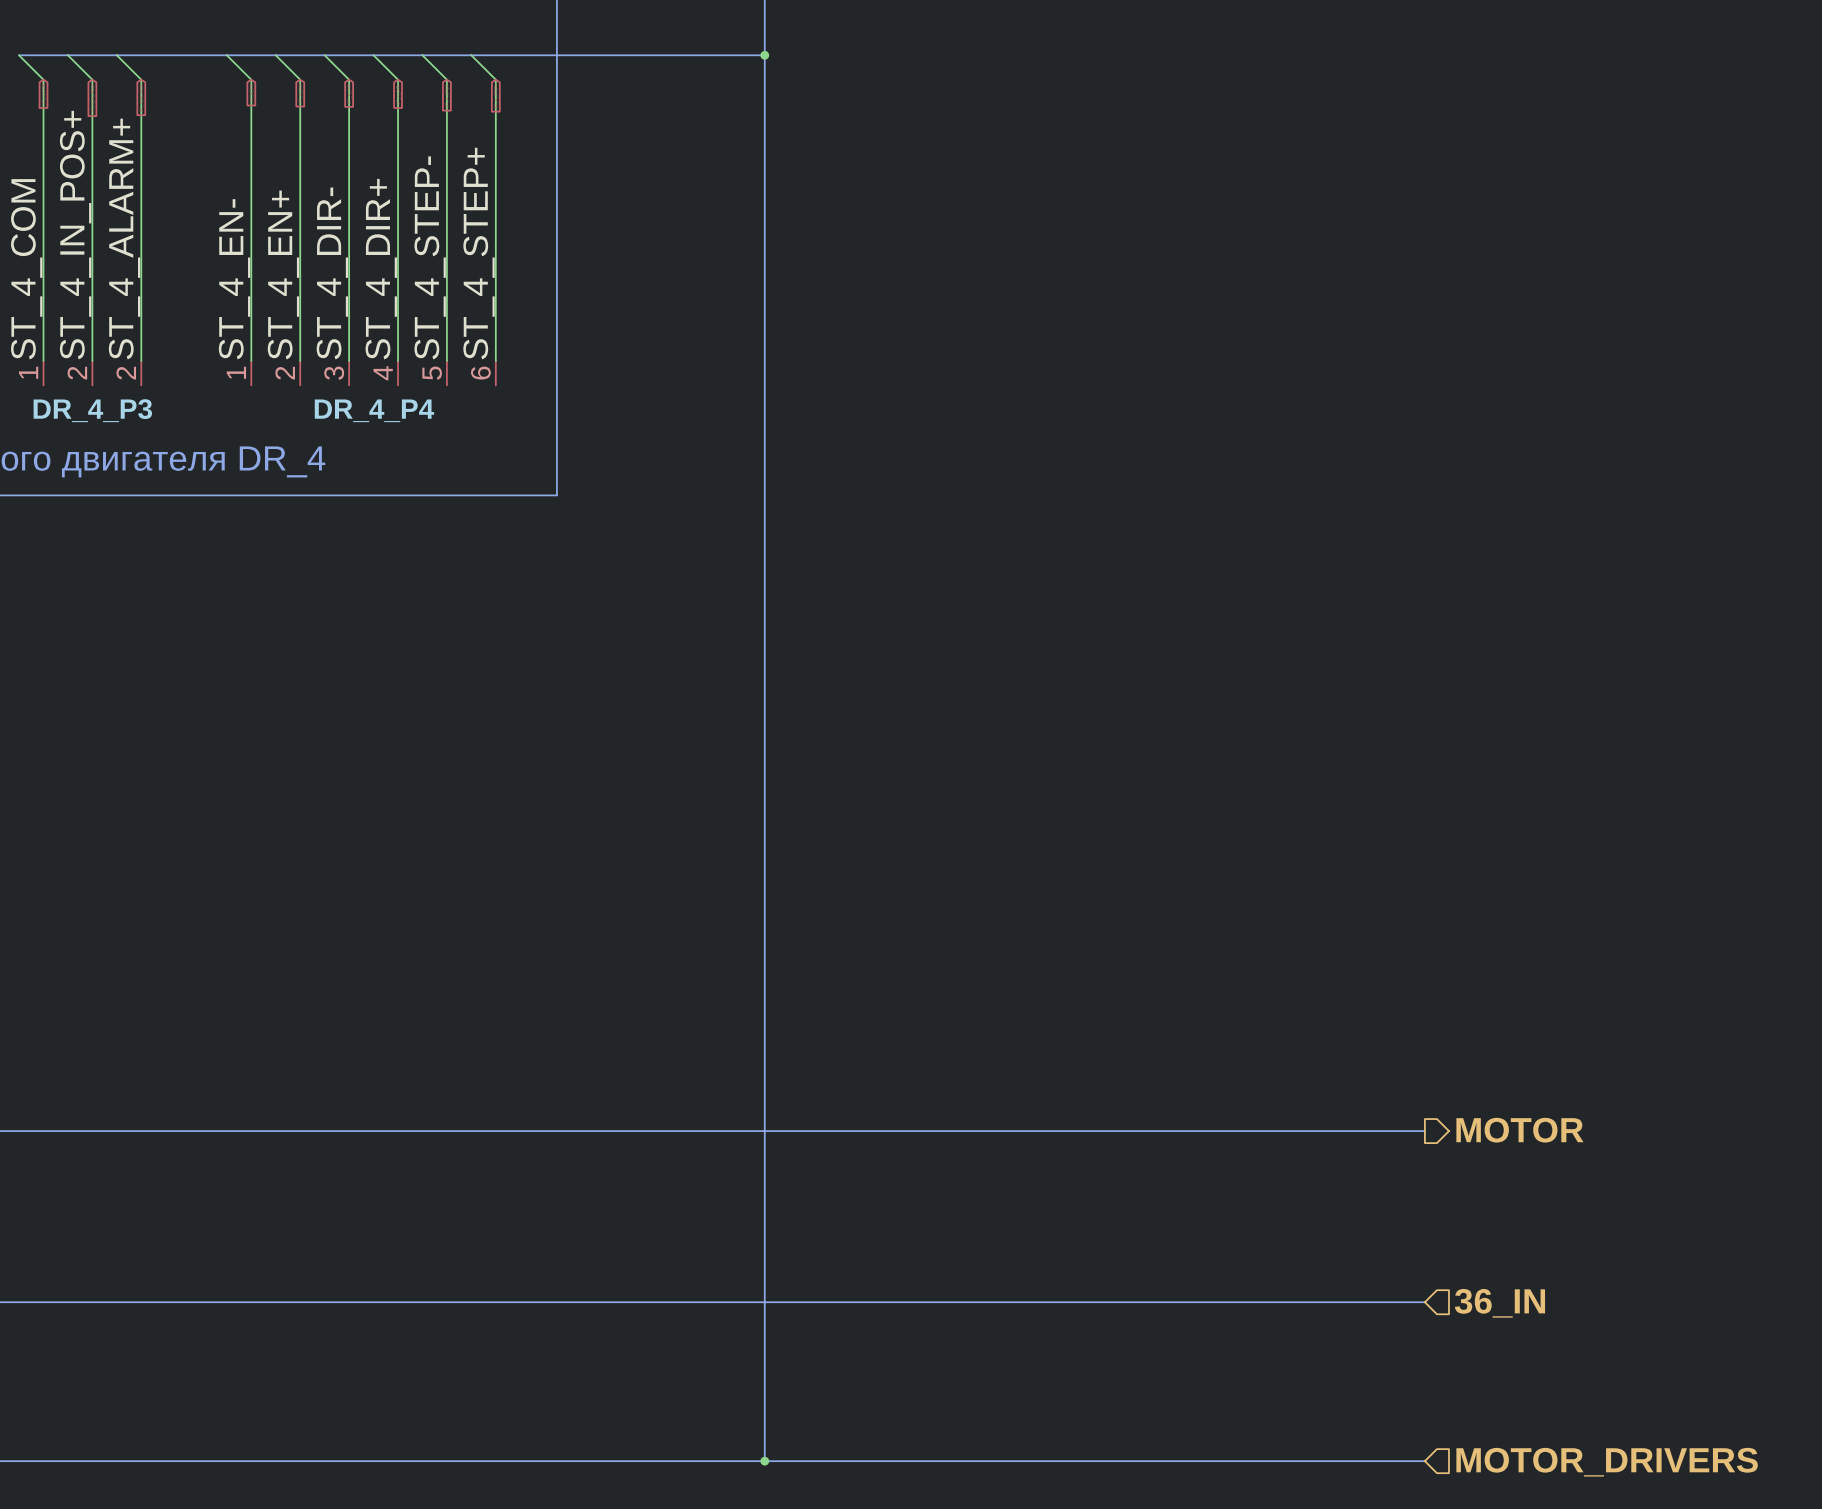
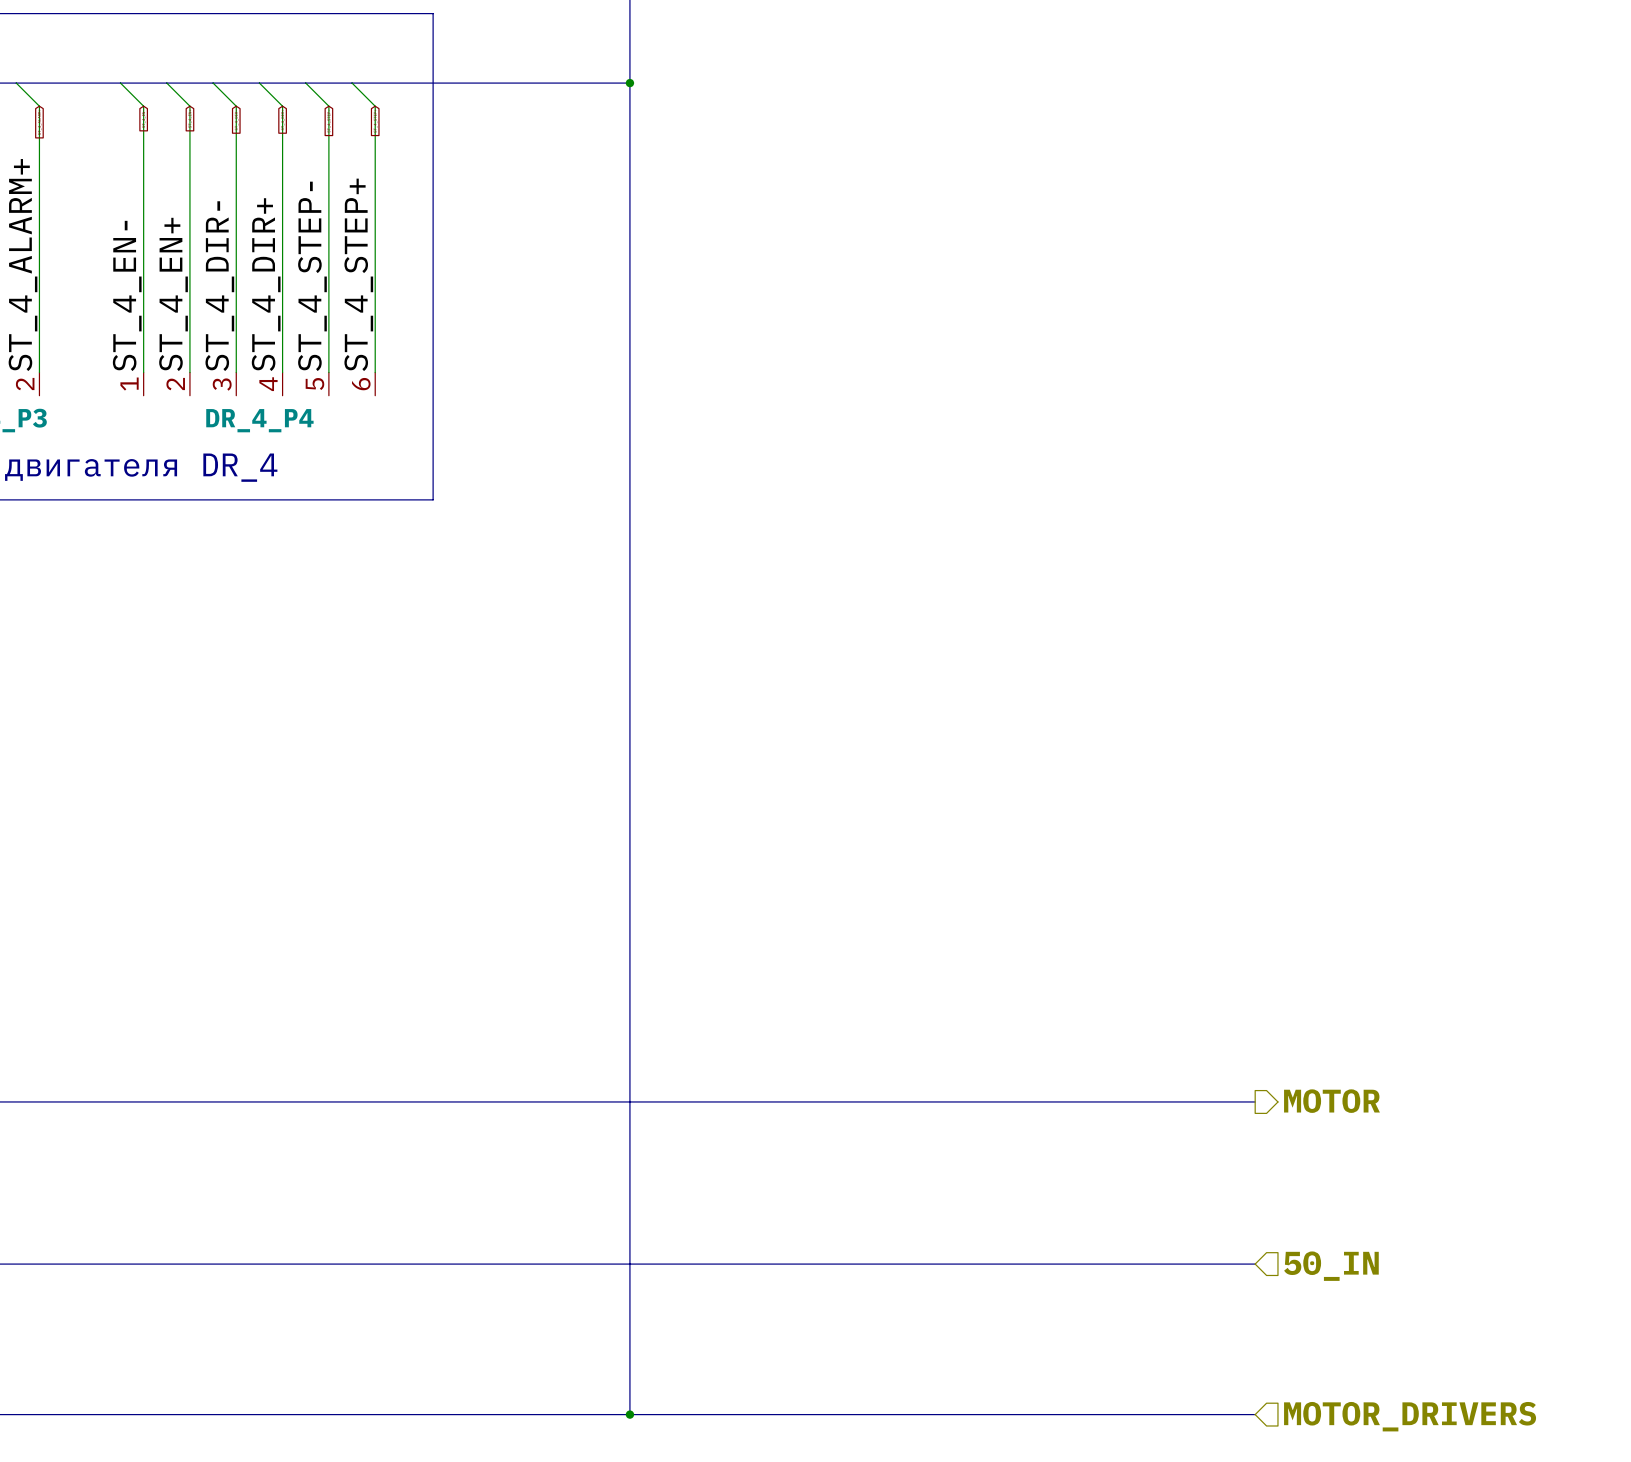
hierarchical label: 36_IN (1499, 1303) -> 50_IN (1331, 1266)

